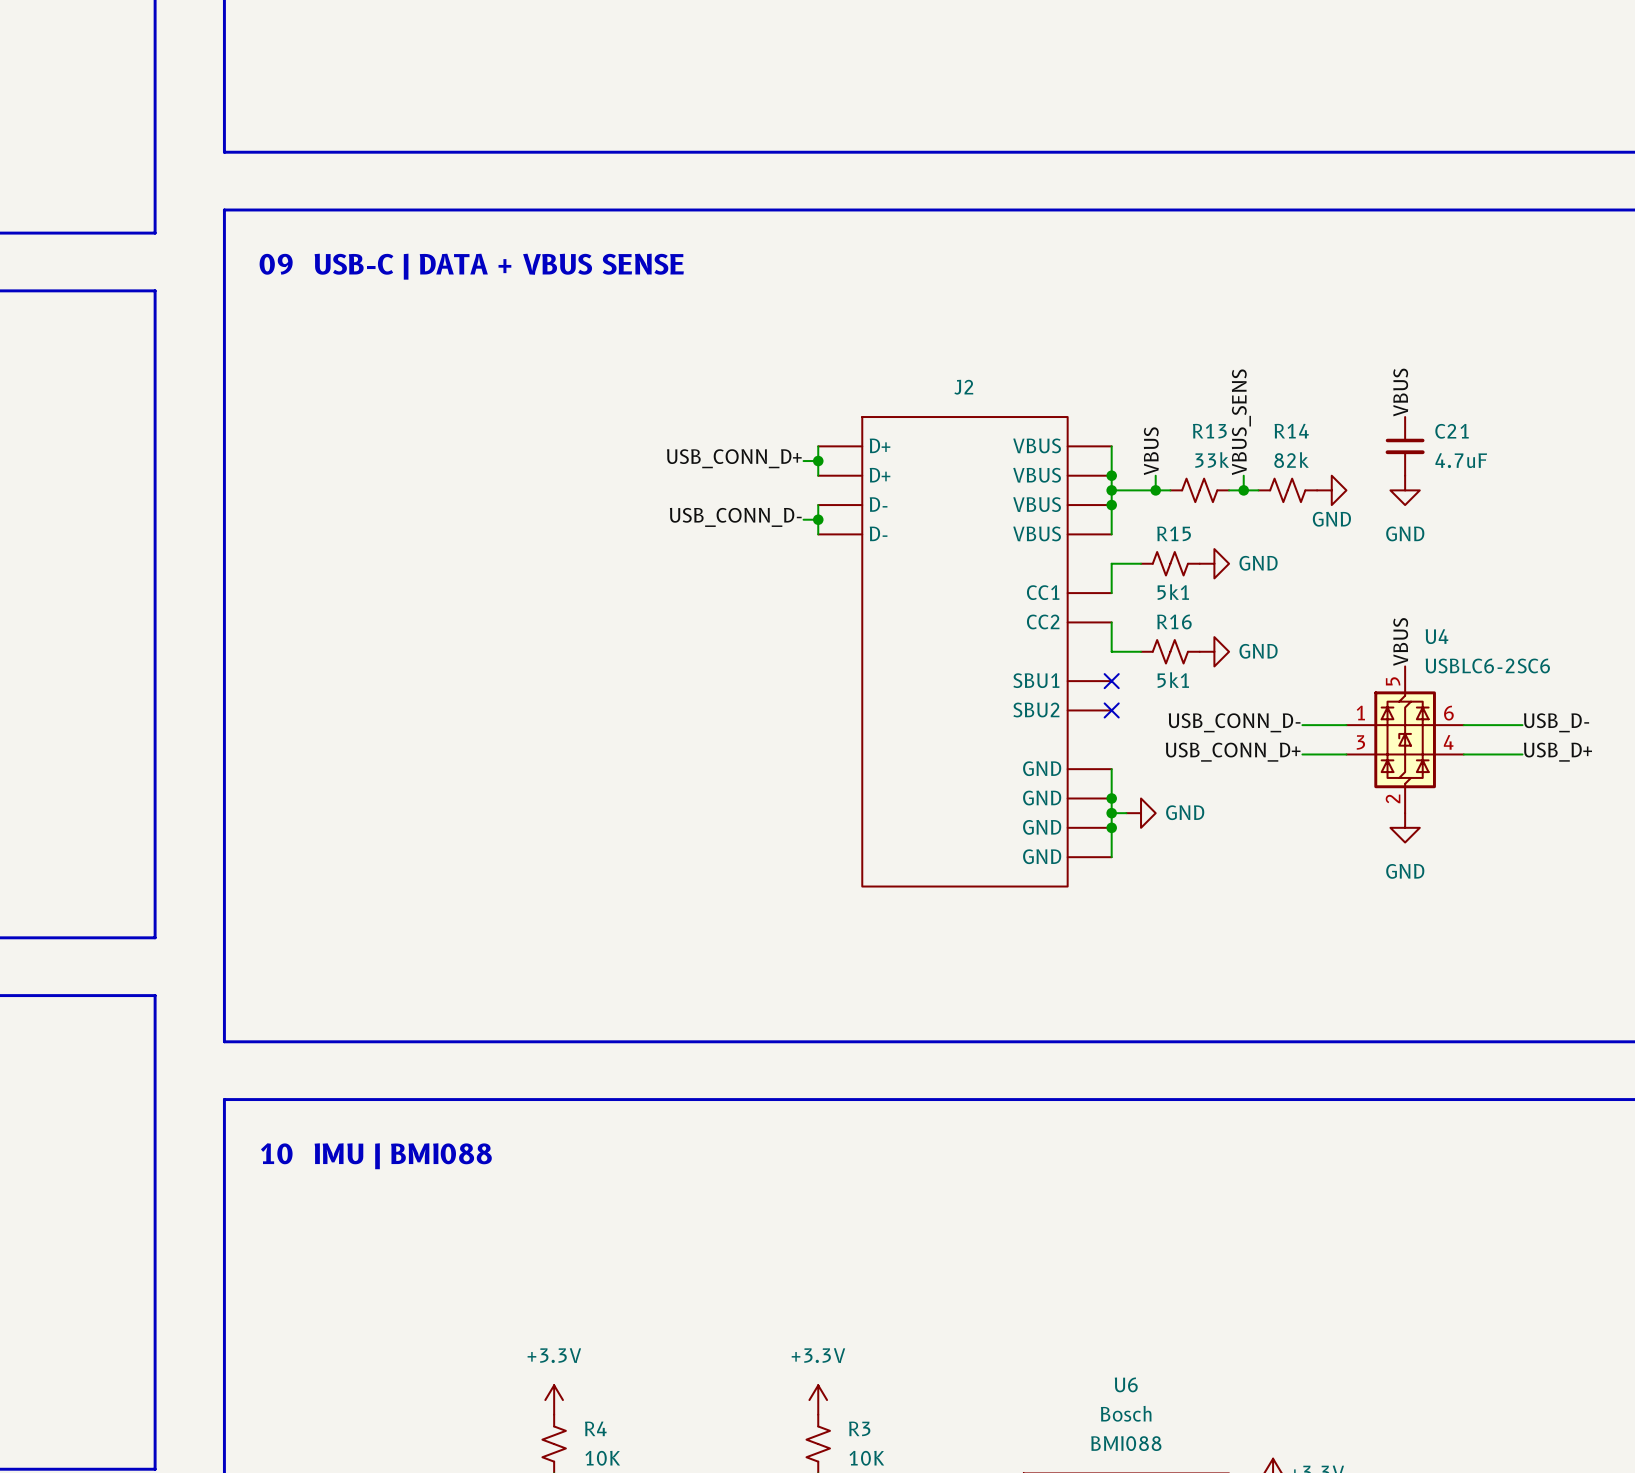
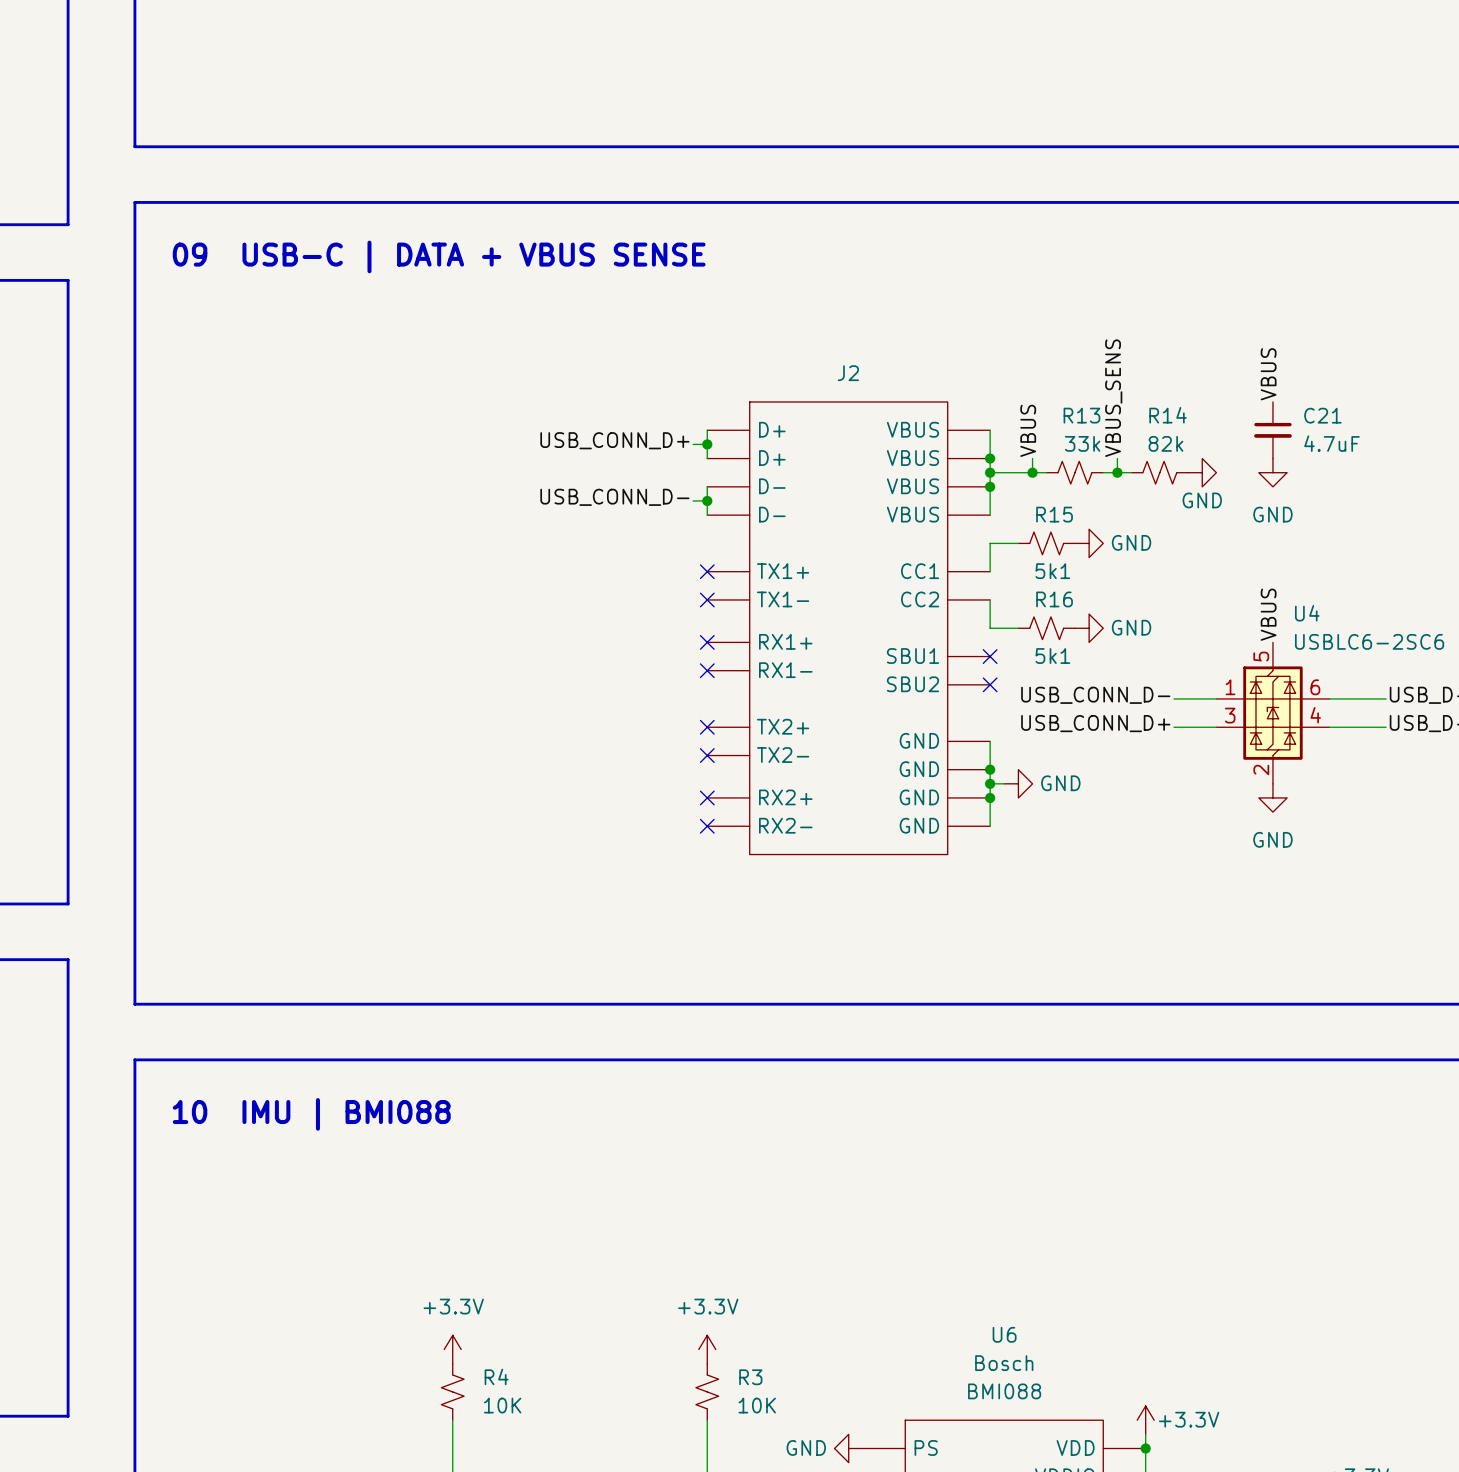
J2 symbol: [818, 417, 1112, 887] -> [707, 401, 991, 855]
no-connect mark: none -> (707, 571)
no-connect mark: none -> (707, 599)
no-connect mark: none -> (707, 642)
no-connect mark: none -> (707, 670)
no-connect mark: none -> (707, 727)
no-connect mark: none -> (707, 755)
no-connect mark: none -> (707, 797)
no-connect mark: none -> (707, 826)

